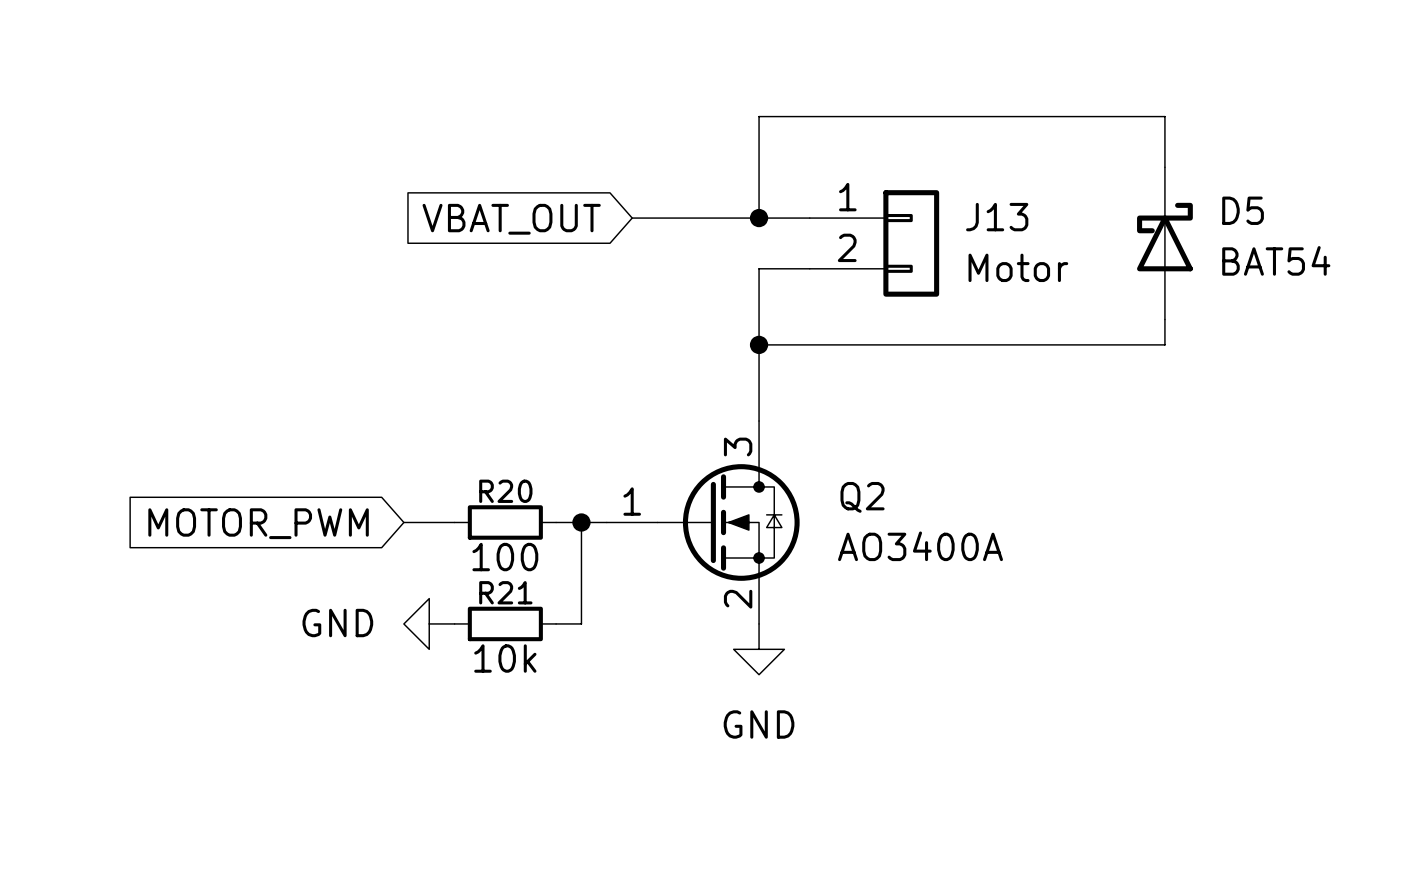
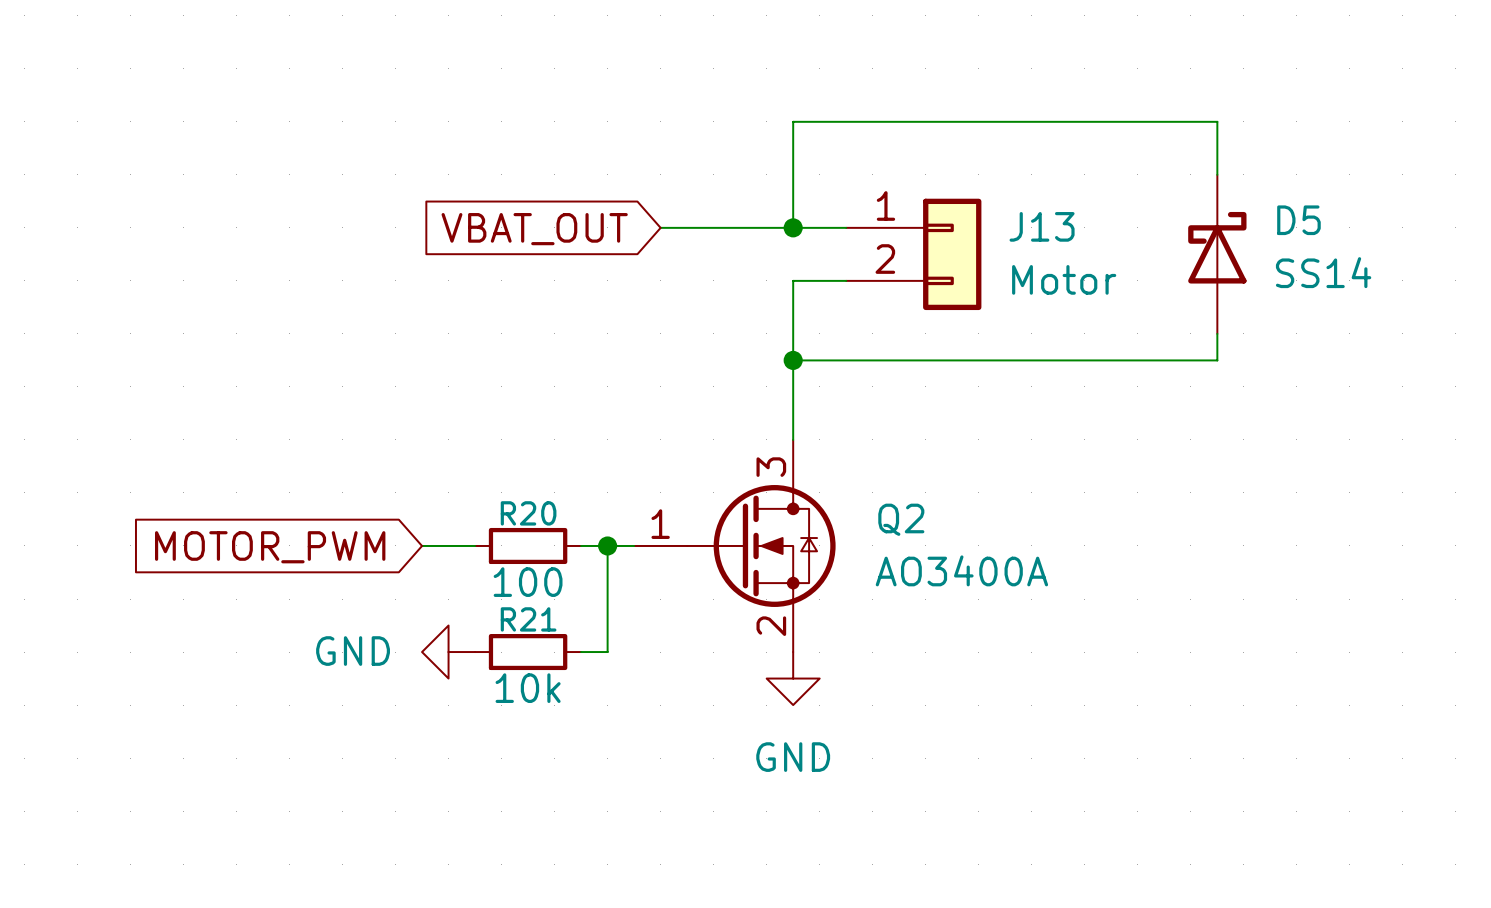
D5 value: BAT54 (1276, 260) -> SS14 (1323, 272)

